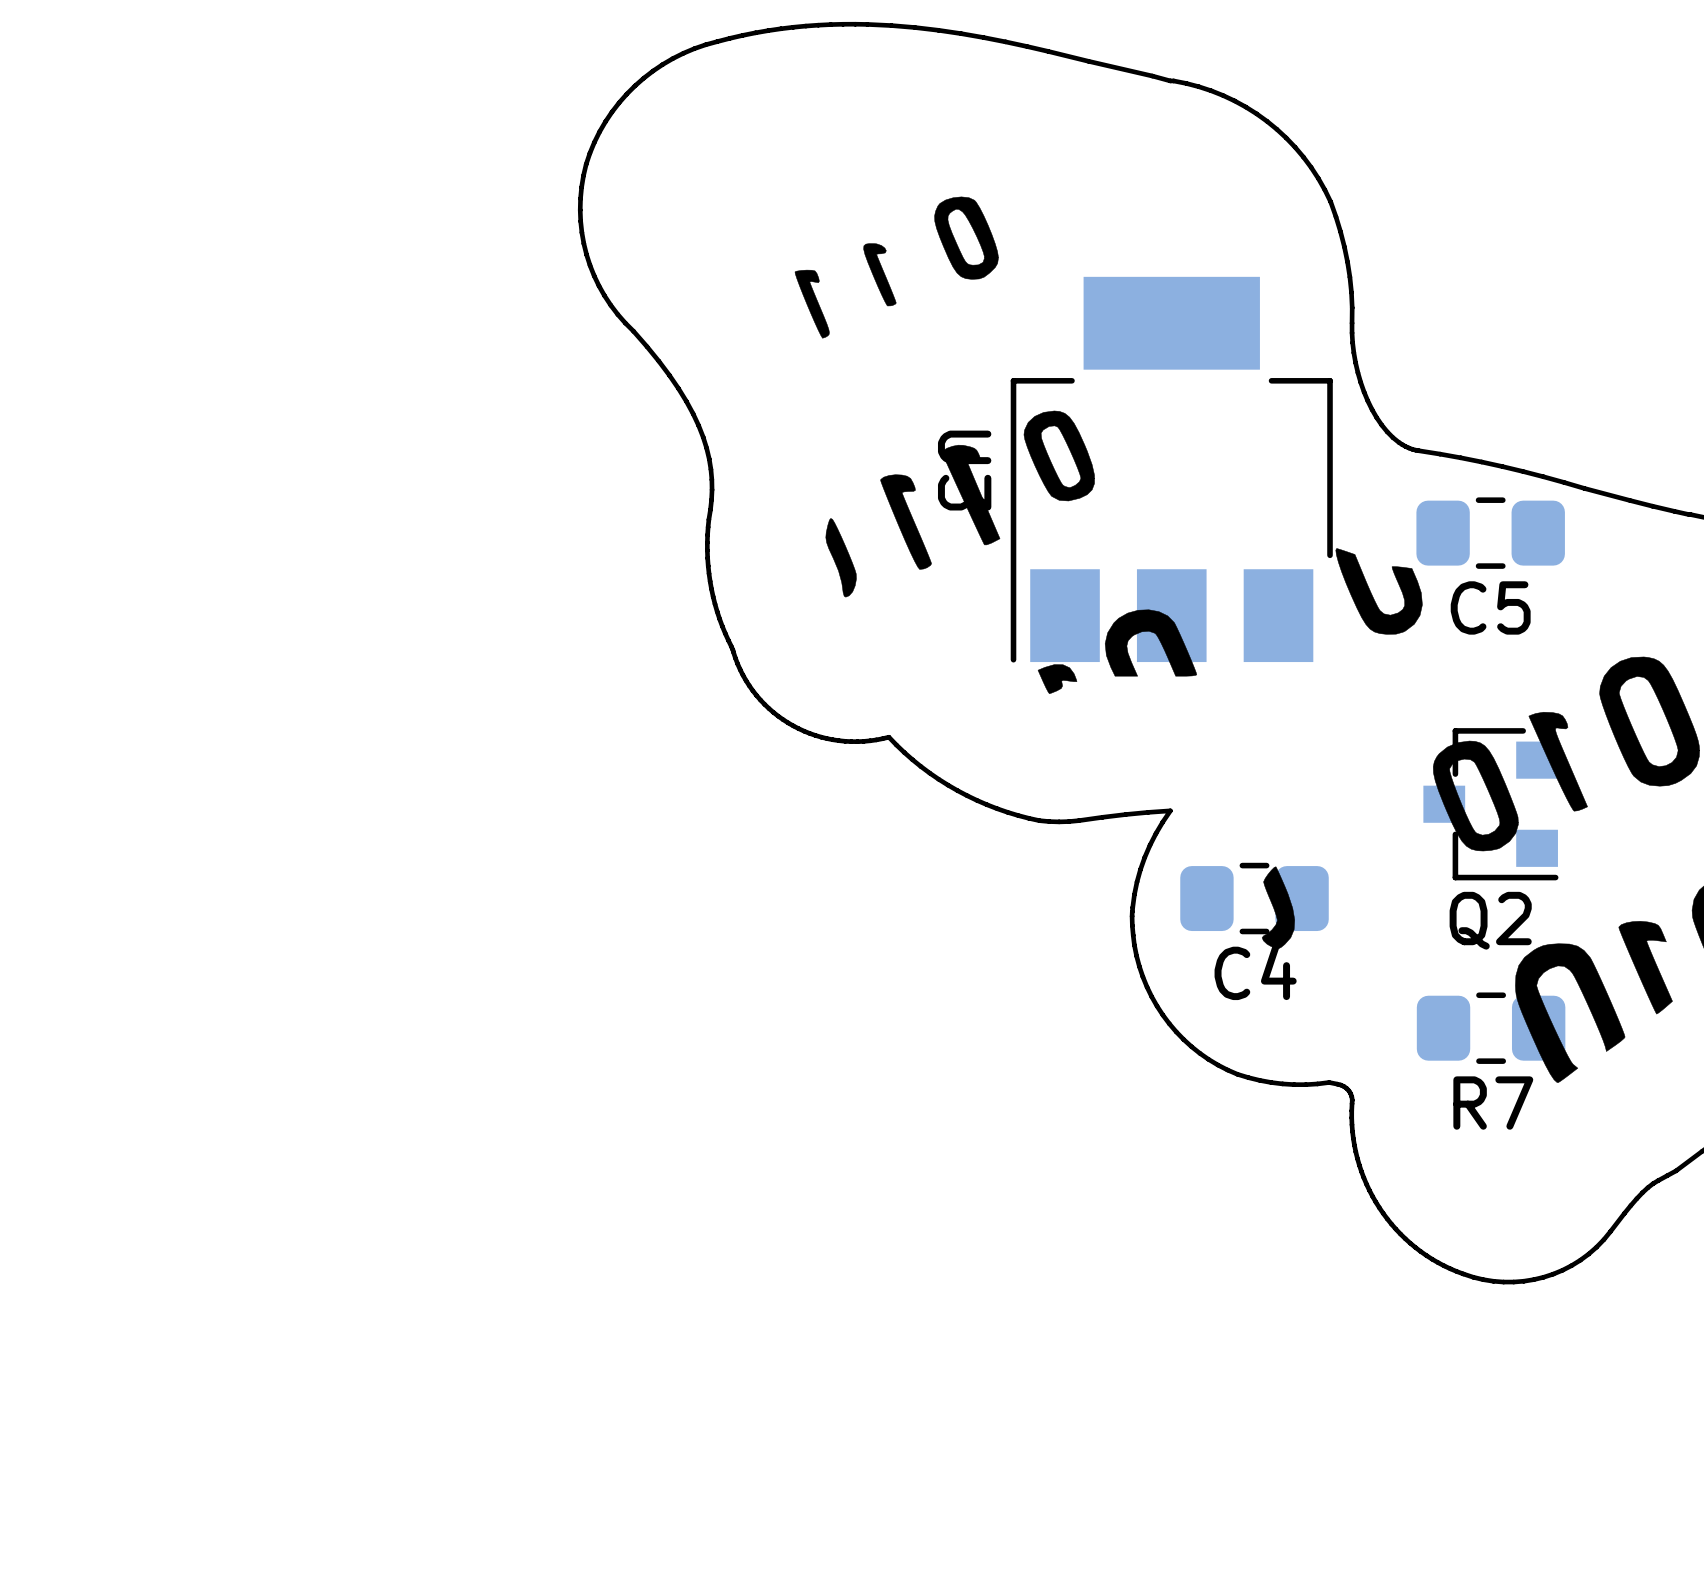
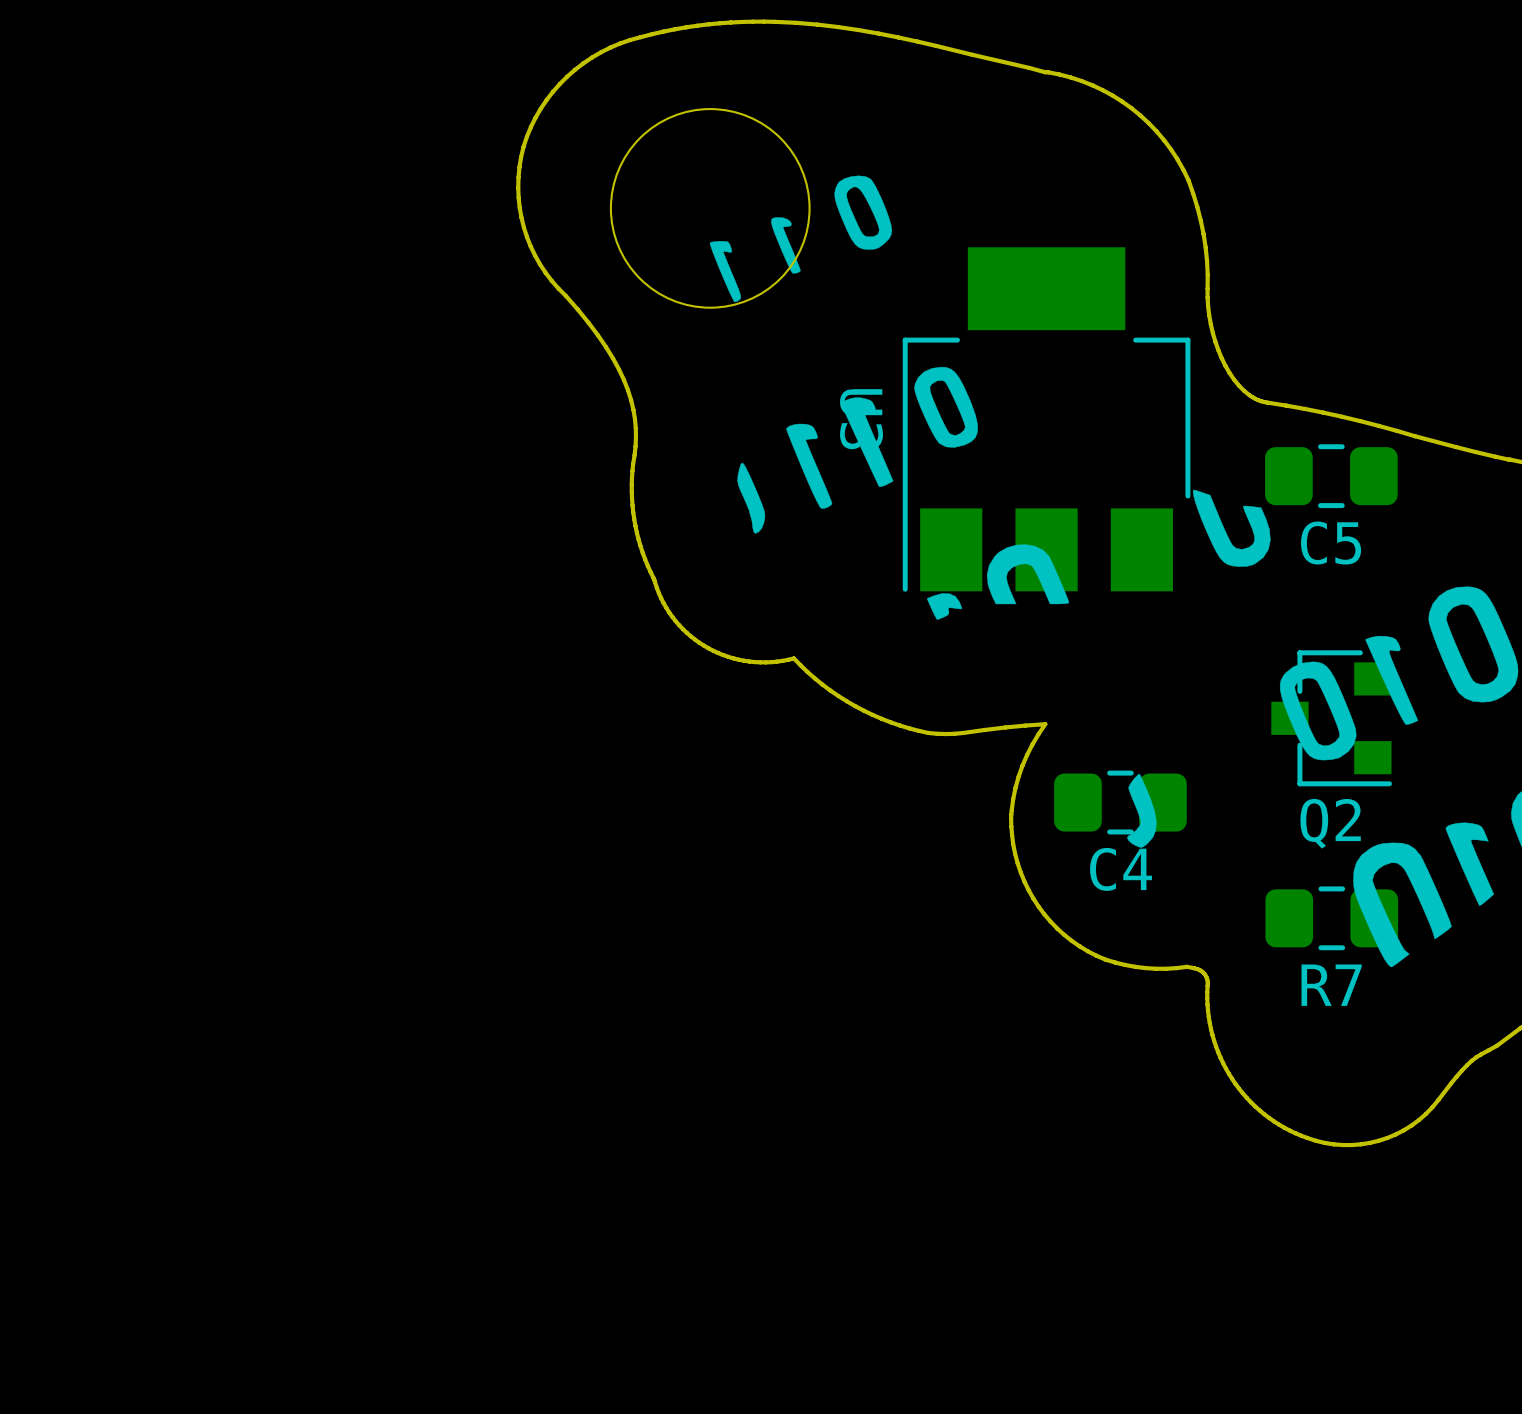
round board edge: none -> [609, 108, 811, 309]

